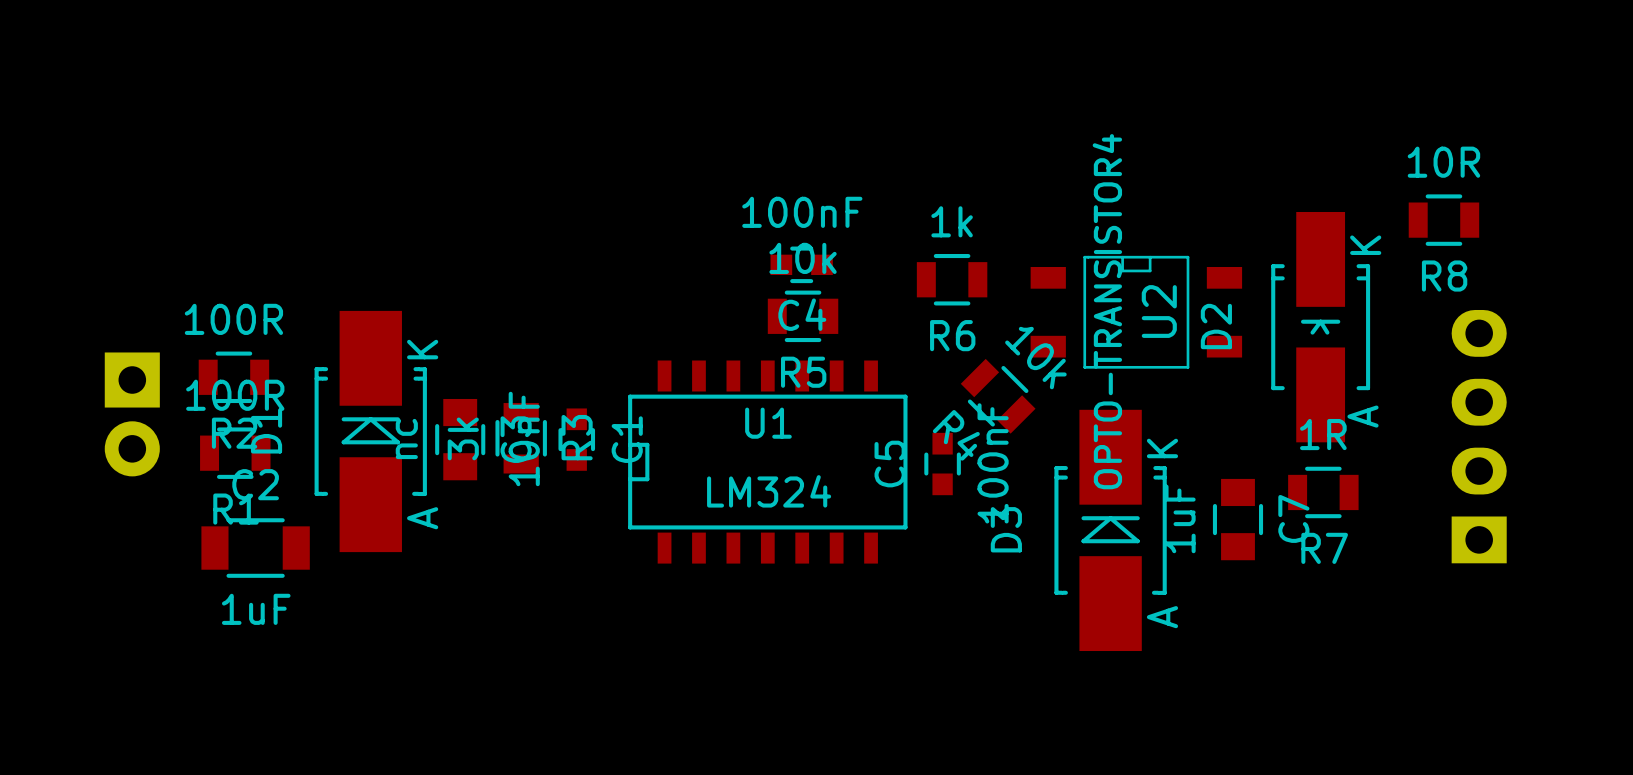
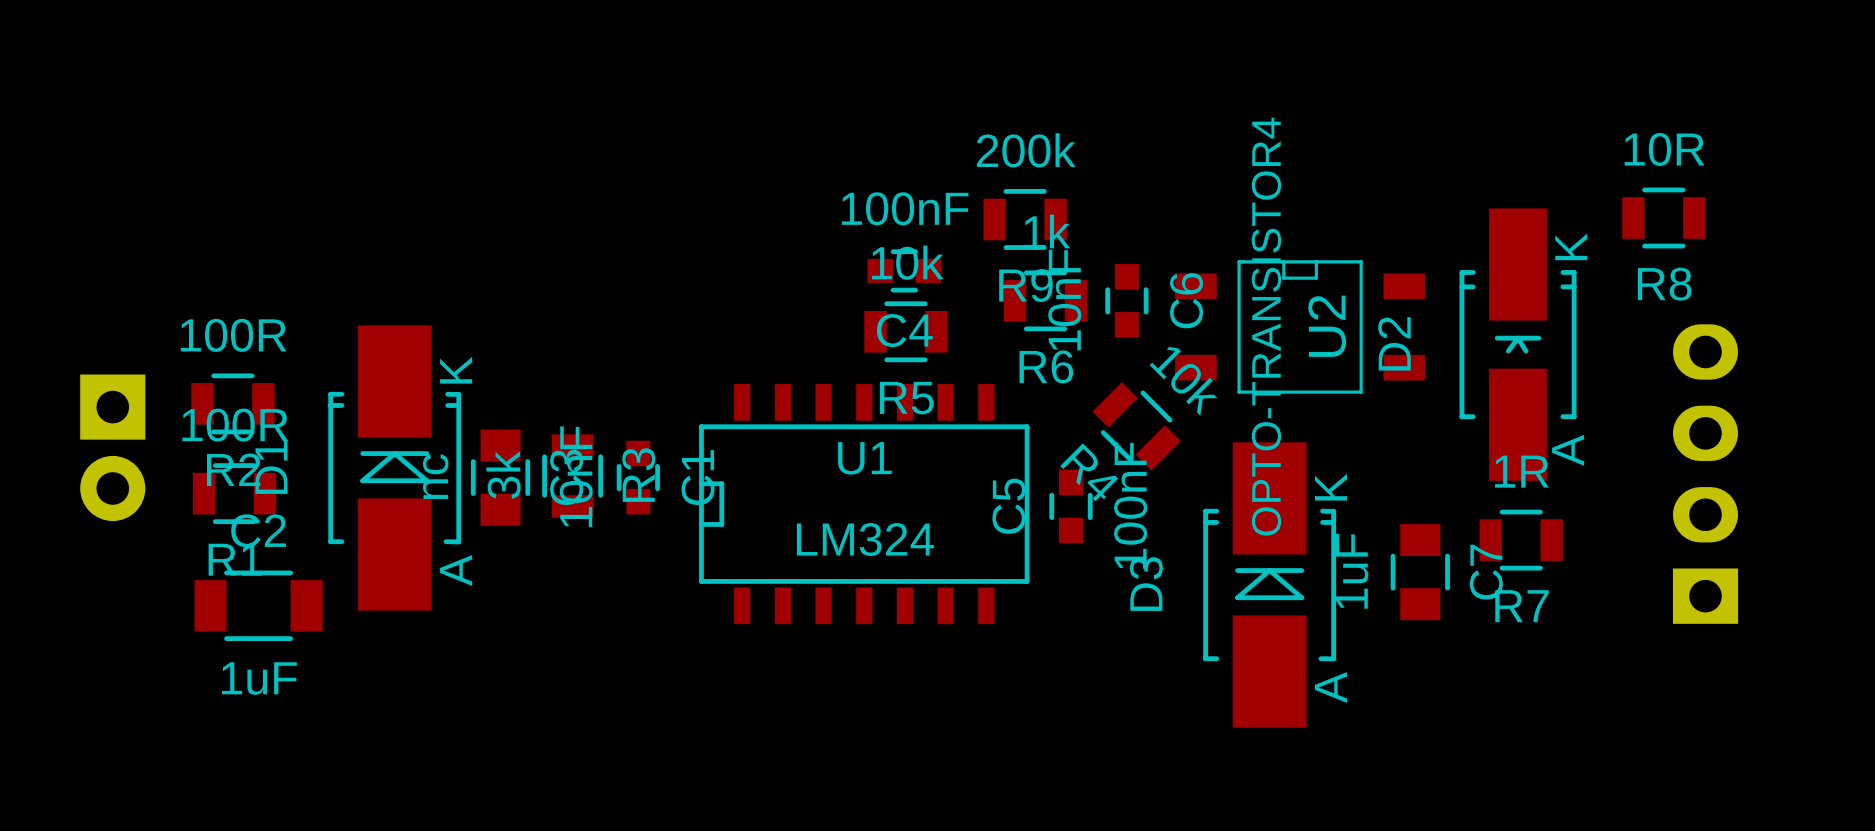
R9: none -> 200k (1025, 219)
R6 position: (952, 279) -> (1045, 300)
C6: none -> 10nF (1126, 300)

